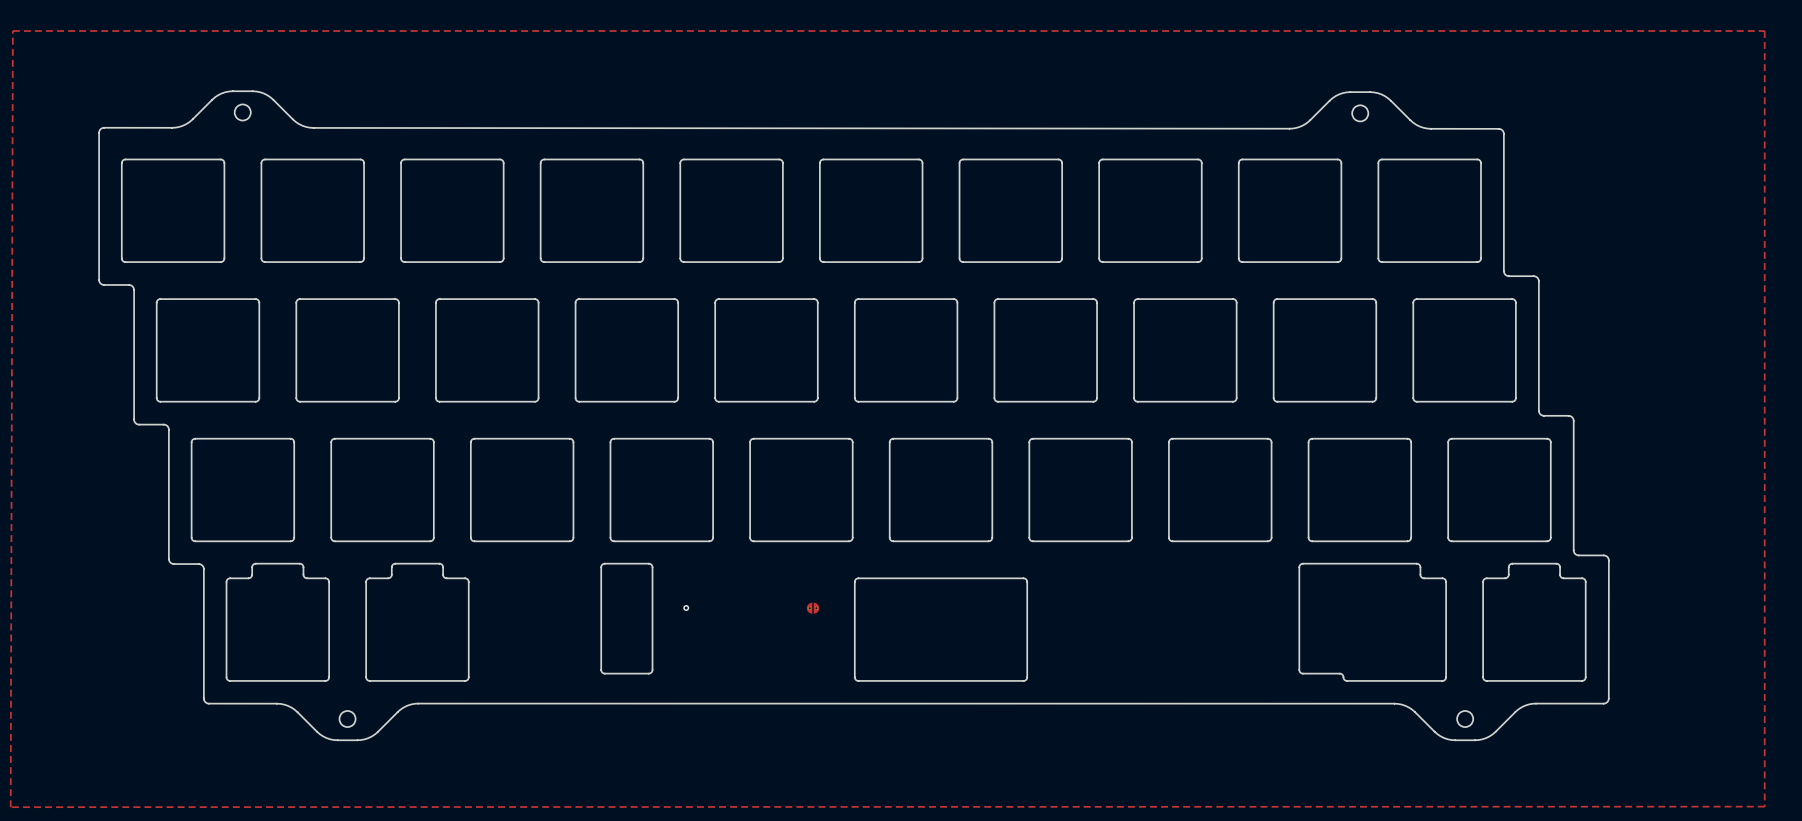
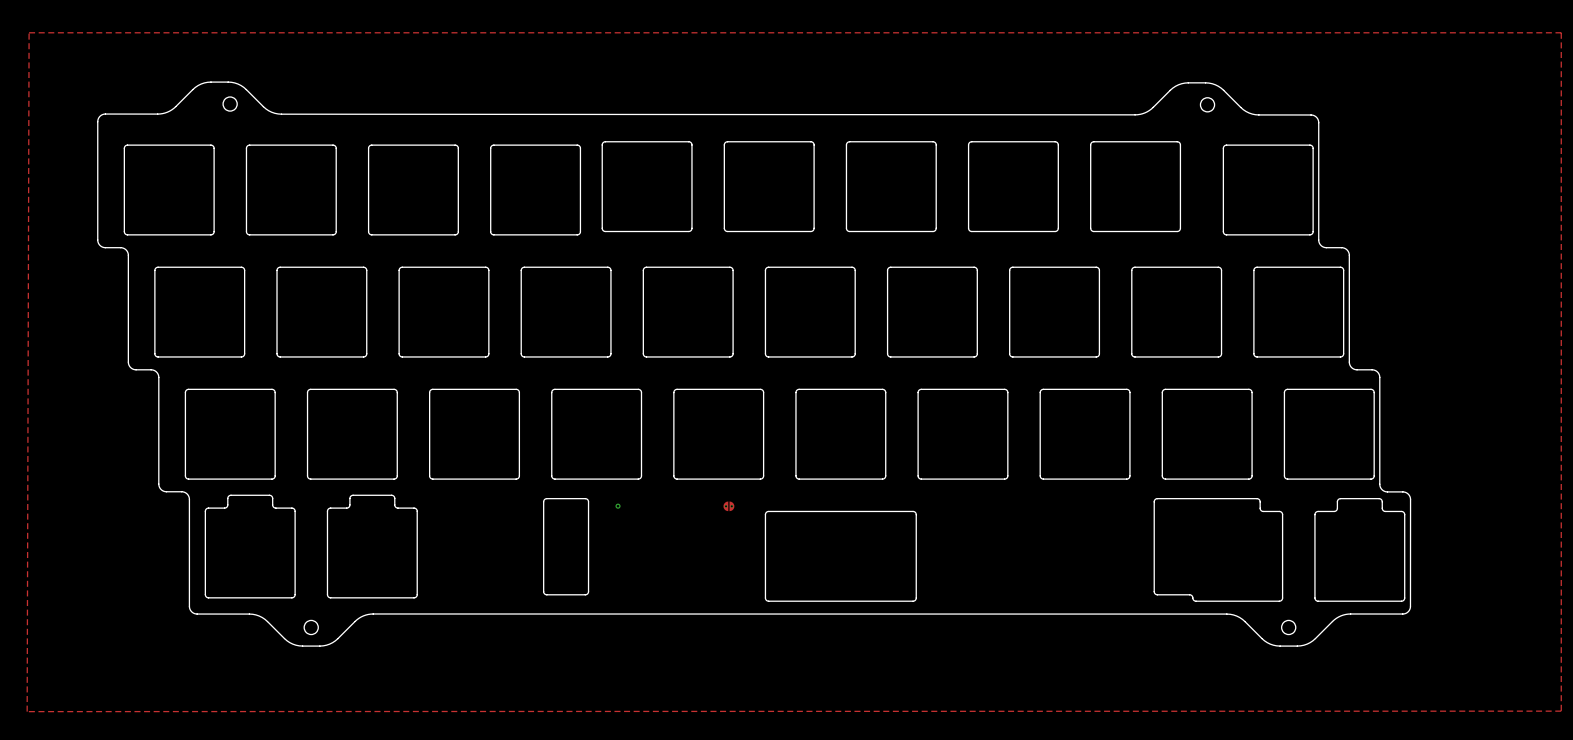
board edge: none -> (688, 141) (605, 141) (602, 144)
board edge: none -> (688, 141) (691, 144) (691, 228)
board edge: none -> (810, 141) (727, 141) (724, 144)
board edge: none -> (810, 141) (814, 144) (814, 228) (810, 231) (725, 230) (724, 144)
board edge: none -> (933, 141) (936, 144) (935, 230) (849, 231)
board edge: none -> (933, 141) (849, 141) (846, 144)
board edge: none -> (602, 144) (602, 228) (605, 231)
board edge: (683, 159) (781, 160) (781, 261) (681, 261) (680, 163) (683, 159) -> none
board edge: (823, 159) (921, 160) (921, 261) (820, 261) (819, 163) (823, 159) -> none
board edge: none -> (846, 144) (846, 228) (849, 231)
board edge: (963, 159) (1061, 160) (1061, 261) (960, 261) (959, 163) (963, 159) -> none
board edge: none -> (968, 144) (968, 228) (971, 231)
board edge: none -> (968, 144) (971, 141) (1057, 142) (1058, 228)
board edge: (1102, 159) (1200, 160) (1200, 261) (1100, 261) (1099, 163) (1102, 159) -> none
board edge: (1242, 159) (1340, 160) (1340, 261) (1239, 261) (1238, 163) (1242, 159) -> none
board edge: none -> (691, 228) (688, 231) (605, 231)
board edge: none -> (1058, 228) (1055, 231) (971, 231)
board edge: none -> (1180, 228) (1179, 142) (1093, 141) (1090, 144) (1090, 228) (1093, 231)
board edge: none -> (1180, 228) (1177, 231) (1093, 231)
board edge: (163, 424) (167, 426) (168, 429) (169, 560) (173, 563) (200, 564) (203, 568) (204, 701) (209, 703) (284, 704) (294, 709) (319, 734) (333, 740) (357, 740) (368, 738) (378, 731) (402, 708) (418, 703) (1394, 703) (1412, 709) (1434, 731) (1444, 738) (1475, 740) (1492, 734) (1517, 710) (1527, 704) (1604, 703) (1608, 699) (1608, 559) (1604, 555) (1578, 555) (1574, 552) (1573, 419) (1569, 415) (1542, 415) (1538, 411) (1538, 279) (1534, 276) (1507, 276) (1504, 272) (1503, 132) (1498, 128) (1423, 127) (1413, 122) (1387, 98) (1373, 92) (1350, 92) (1339, 94) (1329, 100) (1305, 123) (1289, 128) (313, 127) (295, 121) (273, 99) (263, 93) (252, 91) (225, 92) (215, 97) (190, 121) (180, 126) (103, 127) (99, 131) (99, 281) (102, 284) (129, 285) (133, 288) (134, 420) (138, 424) (163, 424) -> (210, 82) (195, 87) (173, 108) (165, 112) (104, 114) (99, 116) (97, 121) (97, 241) (102, 247) (122, 247) (128, 253) (128, 363) (133, 369) (153, 370) (158, 375) (158, 485) (163, 491) (183, 492) (189, 497) (189, 606) (194, 613) (256, 614) (264, 619) (289, 642) (302, 646) (329, 644) (358, 618) (373, 613) (1226, 614) (1242, 619) (1270, 644) (1297, 646) (1312, 640) (1334, 619) (1343, 615) (1403, 613) (1409, 609) (1410, 497) (1405, 492) (1385, 491) (1380, 486) (1379, 376) (1375, 370) (1355, 369) (1349, 364) (1349, 254) (1344, 248) (1324, 247) (1318, 241) (1318, 122) (1313, 115) (1252, 114) (1243, 109) (1221, 88) (1205, 82) (1178, 84) (1149, 110) (1135, 114) (281, 114) (265, 108) (237, 84) (210, 82)
board edge: none -> (231, 495) (270, 495) (274, 507) (294, 509) (295, 594) (293, 597) (208, 597) (205, 596) (205, 510) (208, 508) (226, 507) (228, 497) (231, 495)
board edge: none -> (391, 495) (352, 495) (349, 498)
board edge: none -> (391, 495) (394, 497) (396, 507) (414, 508) (417, 510) (417, 594) (414, 597) (330, 597) (327, 596) (327, 510) (330, 508) (348, 507) (349, 498)
board edge: (252, 567) (255, 563) (300, 563) (303, 565) (305, 577) (325, 578) -> none
board edge: (252, 567) (250, 577) (229, 578) (226, 581) (226, 677) (229, 680) (328, 679) (329, 581) (325, 578) -> none
board edge: (446, 578) (443, 576) (442, 566) (440, 563) (395, 563) (392, 565) (389, 577) (366, 579) (366, 677) (369, 680) -> none
board edge: (446, 578) (465, 578) (468, 581) (467, 679) (369, 680) -> none
via position: (686, 608) -> (618, 506)
part position: (813, 608) -> (728, 506)
round board edge position: (347, 719) -> (311, 627)
round board edge position: (1465, 719) -> (1288, 627)

